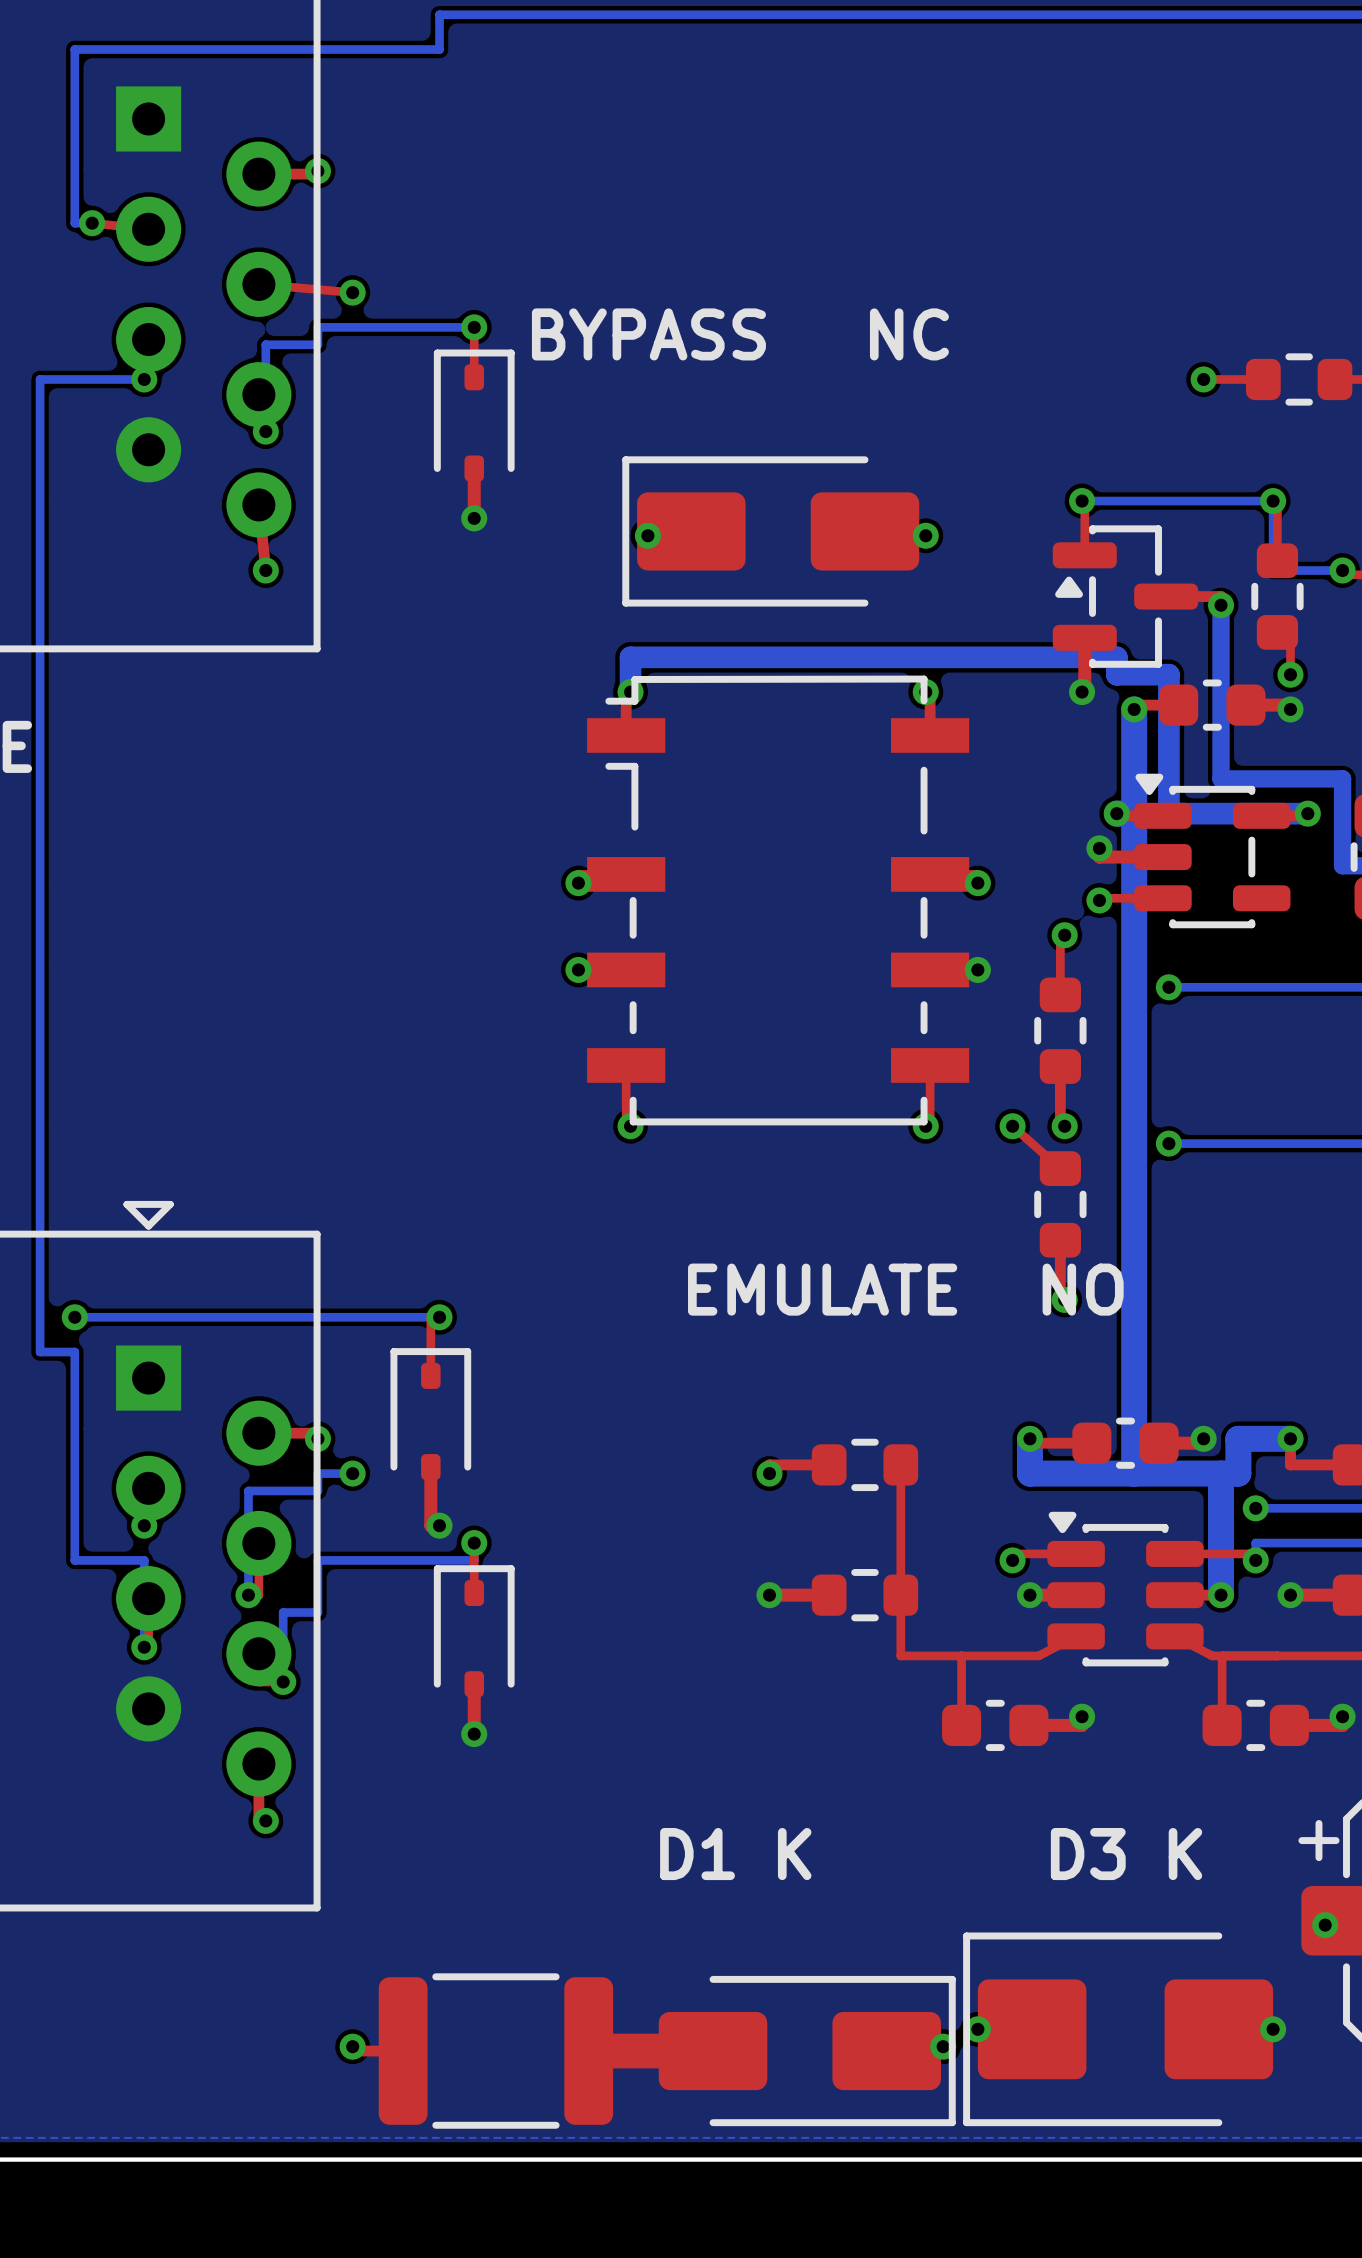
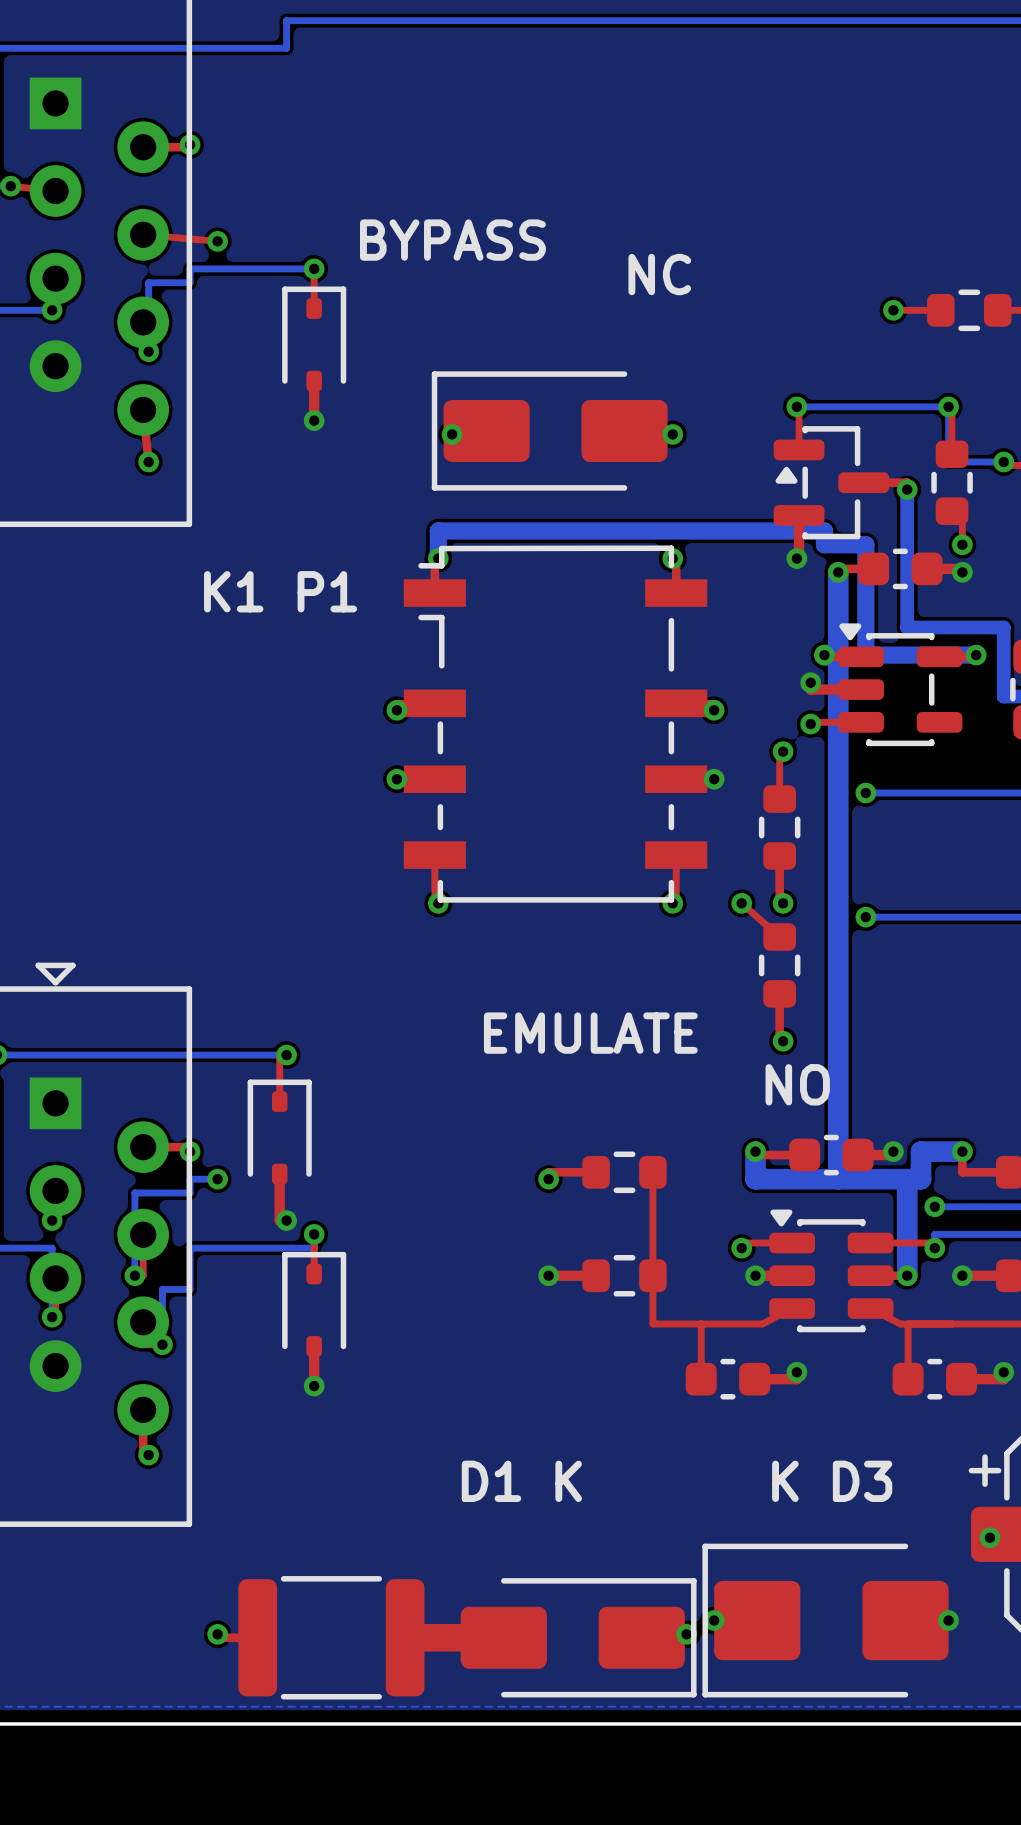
text position: BYPASS (648, 334) -> BYPASS (452, 240)
text: none -> K1 P1 (280, 591)
text position: NO (1083, 1289) -> NO (797, 1084)
text: D3 K (1126, 1854) -> K D3 (832, 1481)

